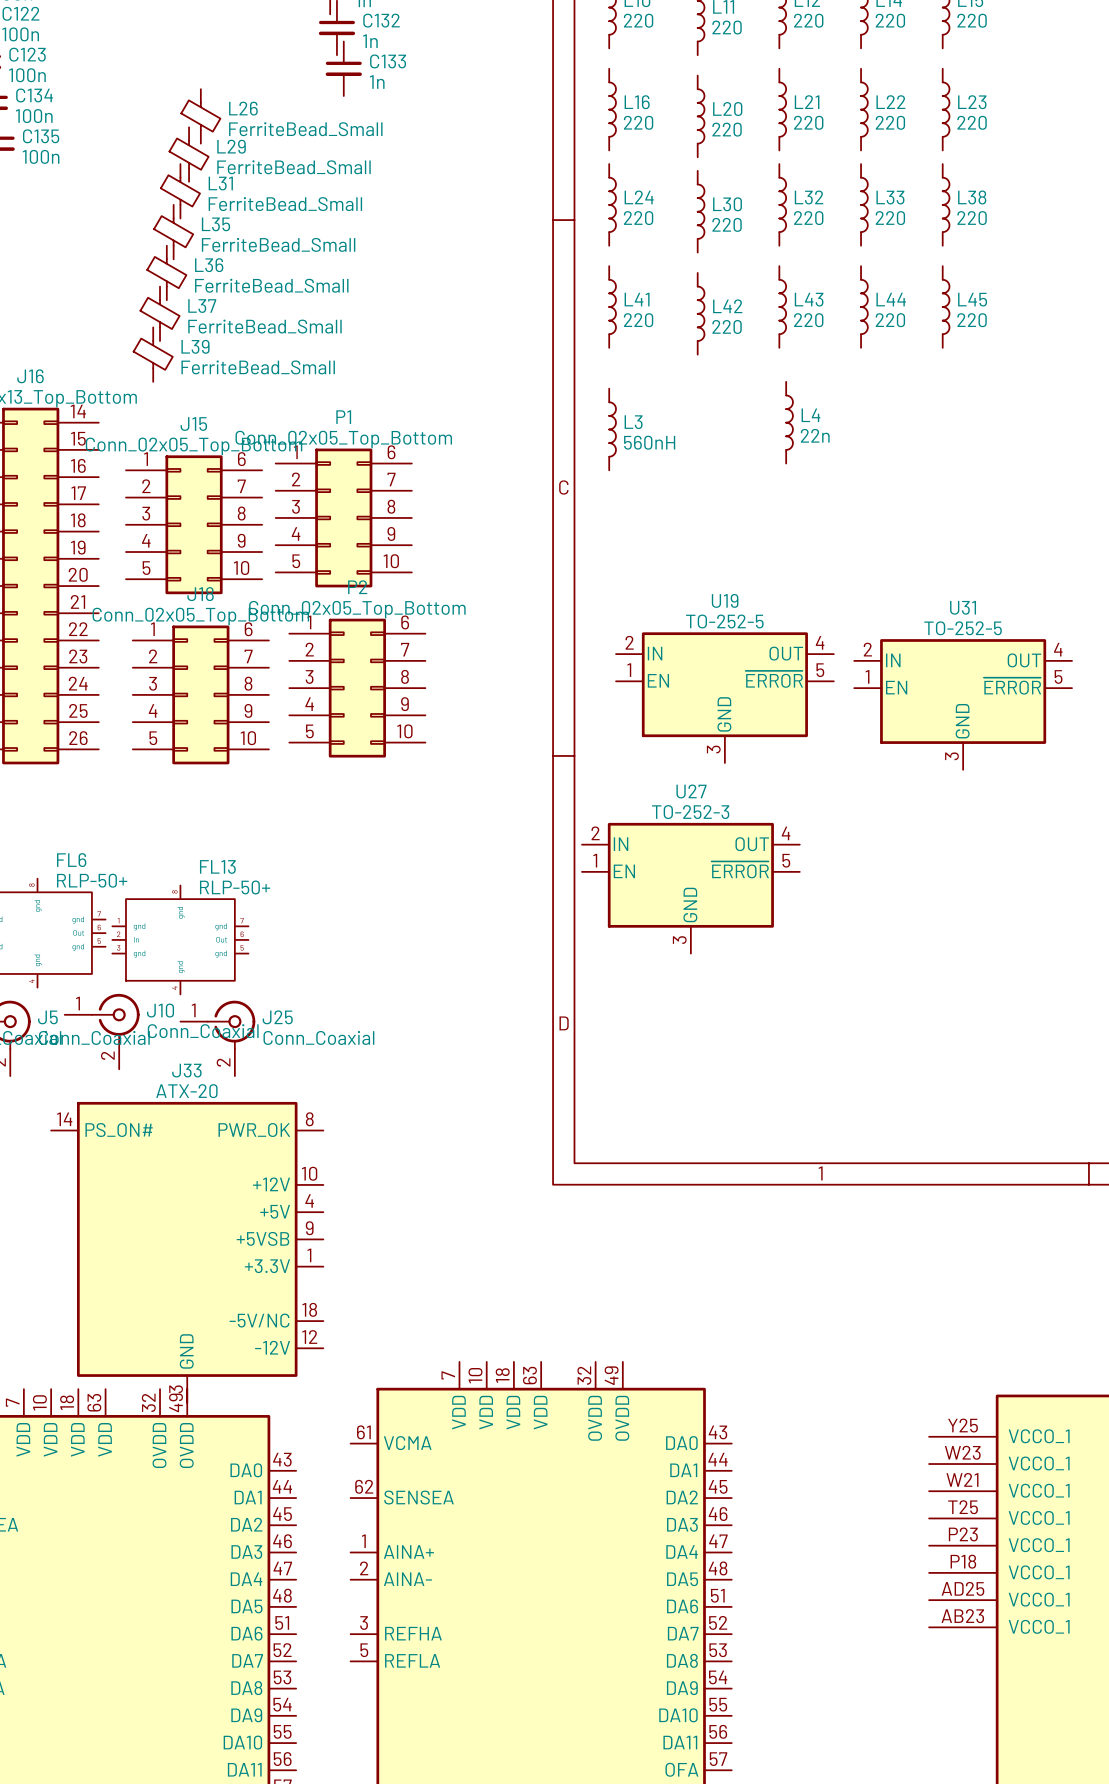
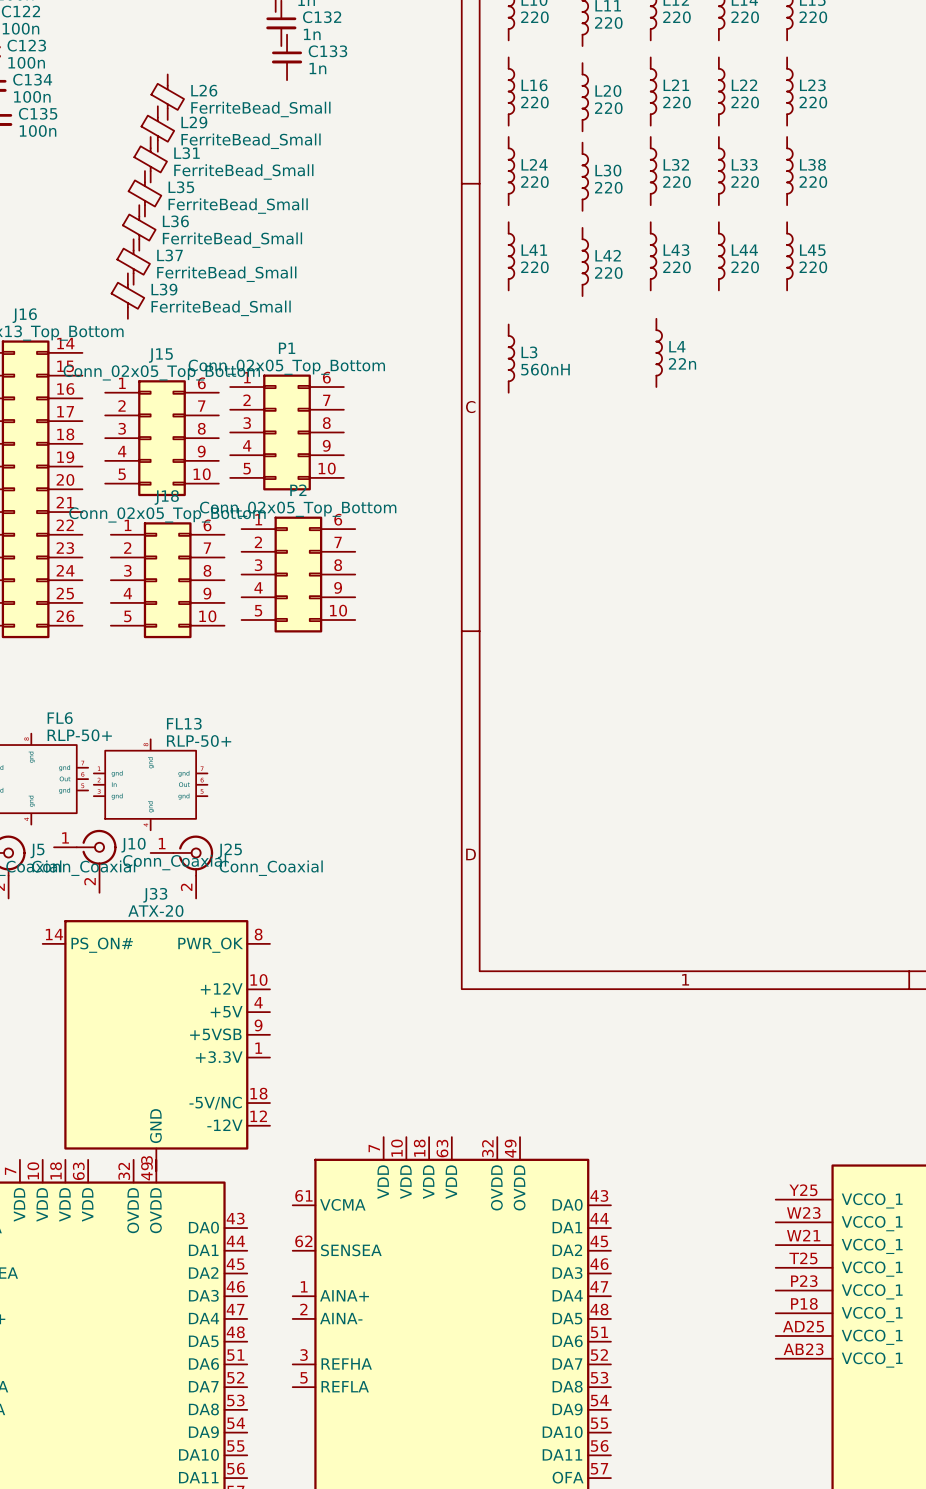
U19: TO-252-5 (724, 697) -> none
U31: TO-252-5 (963, 704) -> none
U27: TO-252-3 (690, 888) -> none

